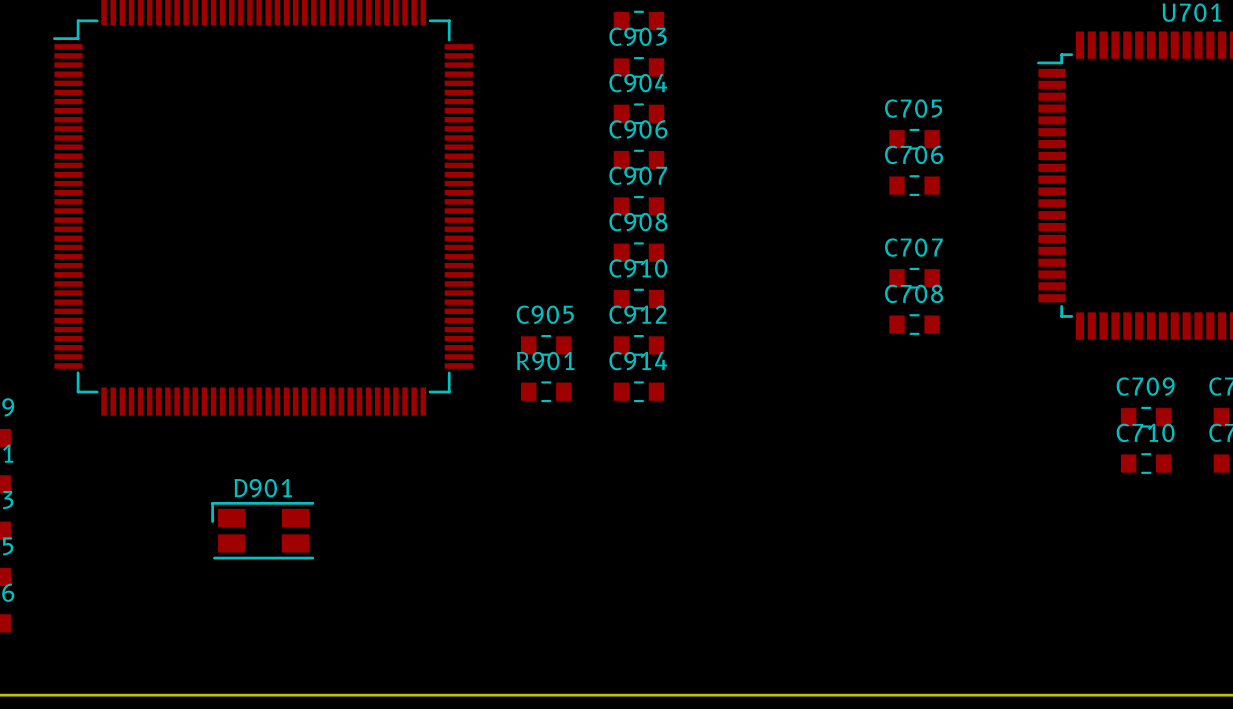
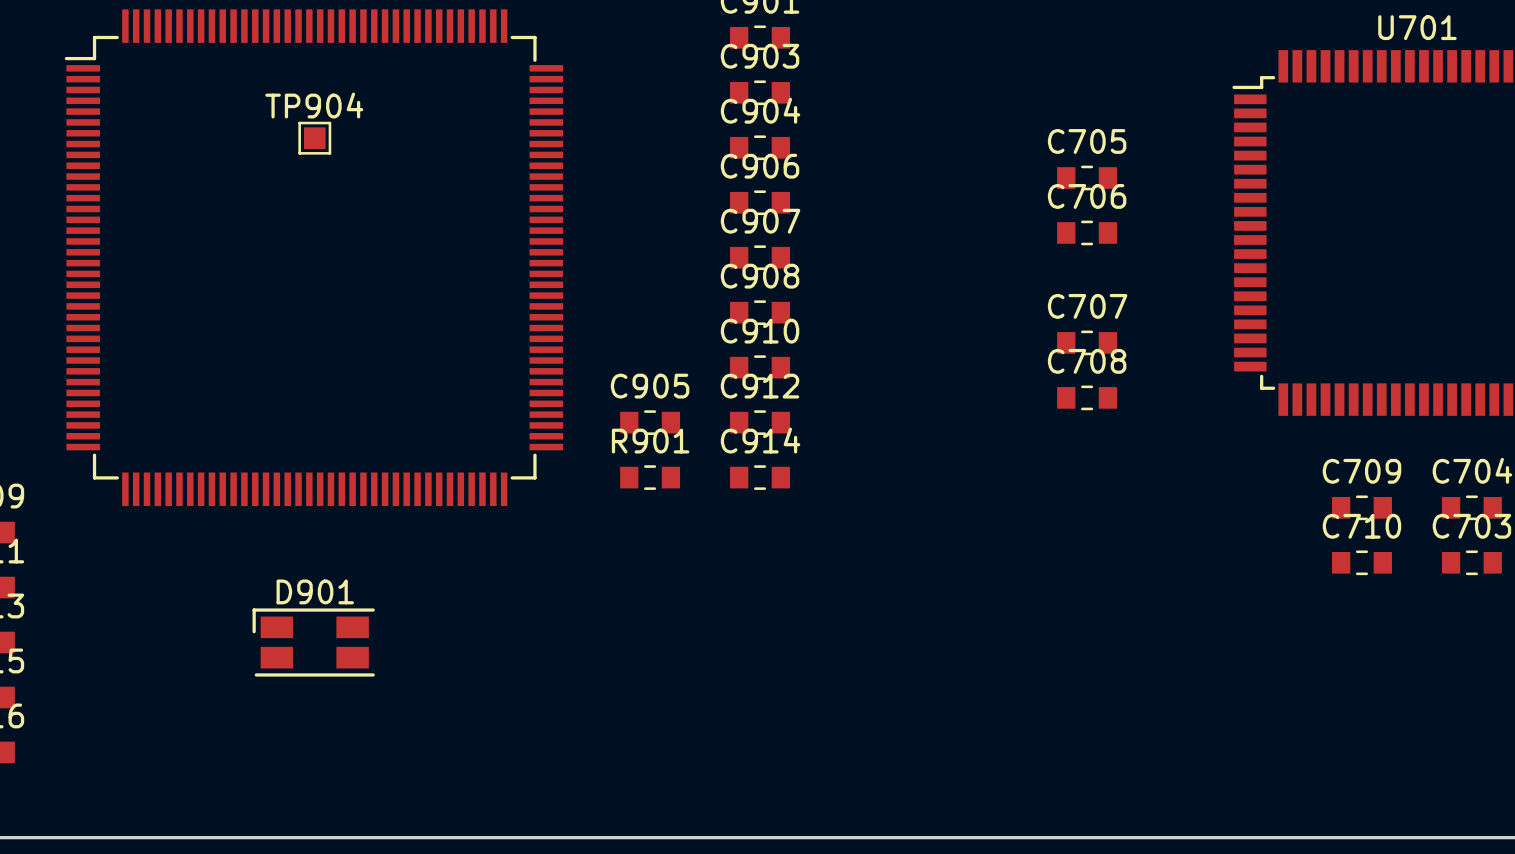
TP904: none -> (314, 138)

